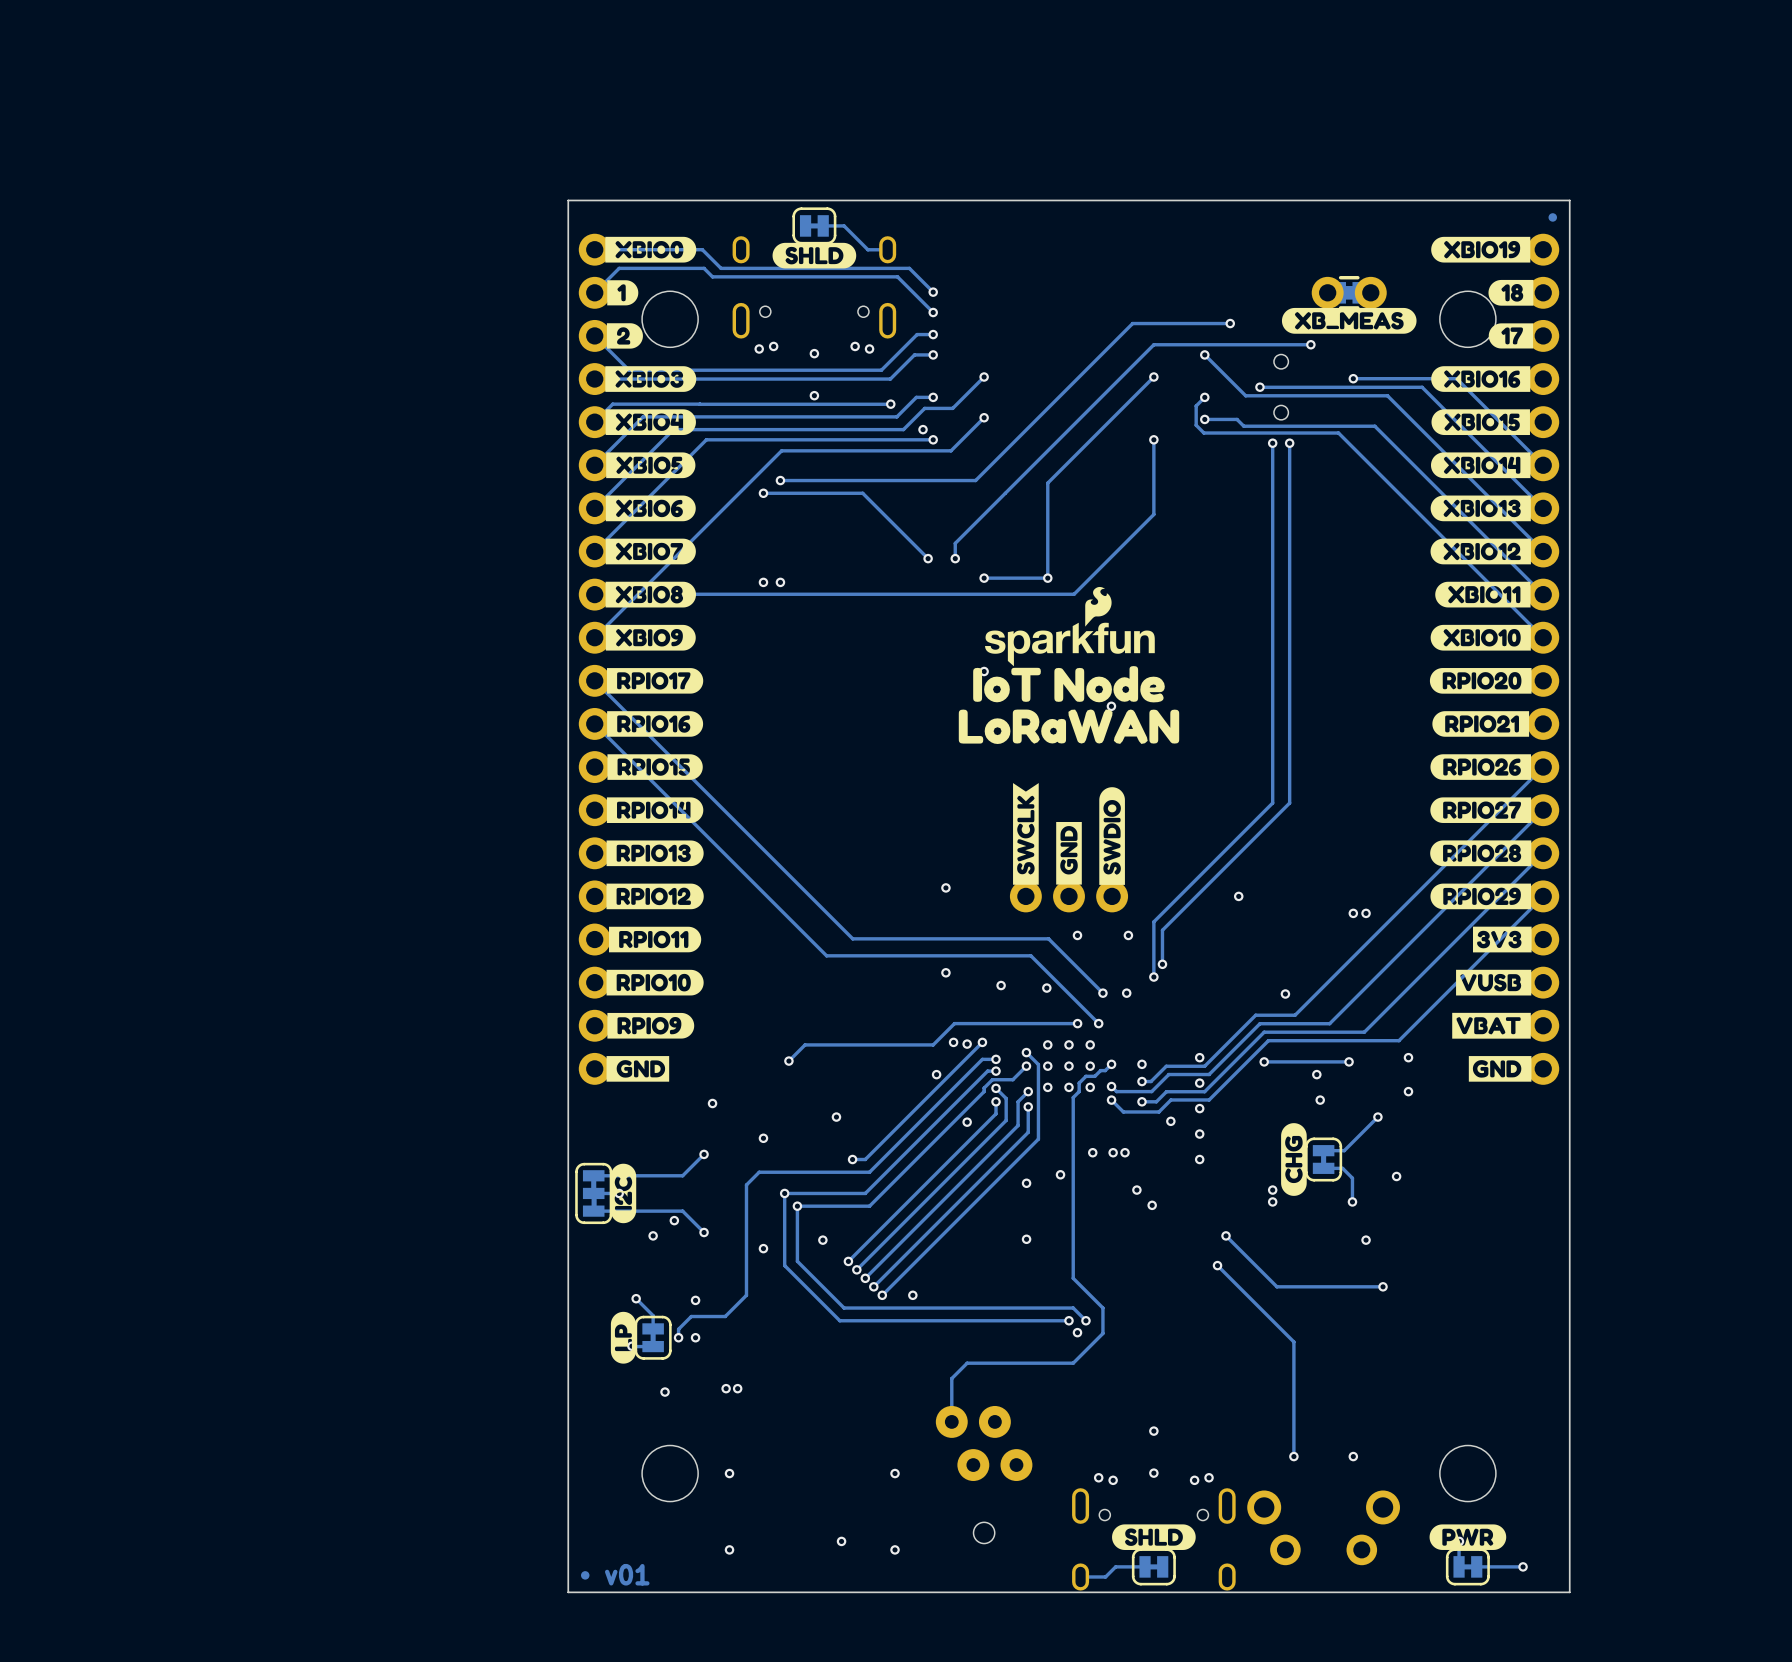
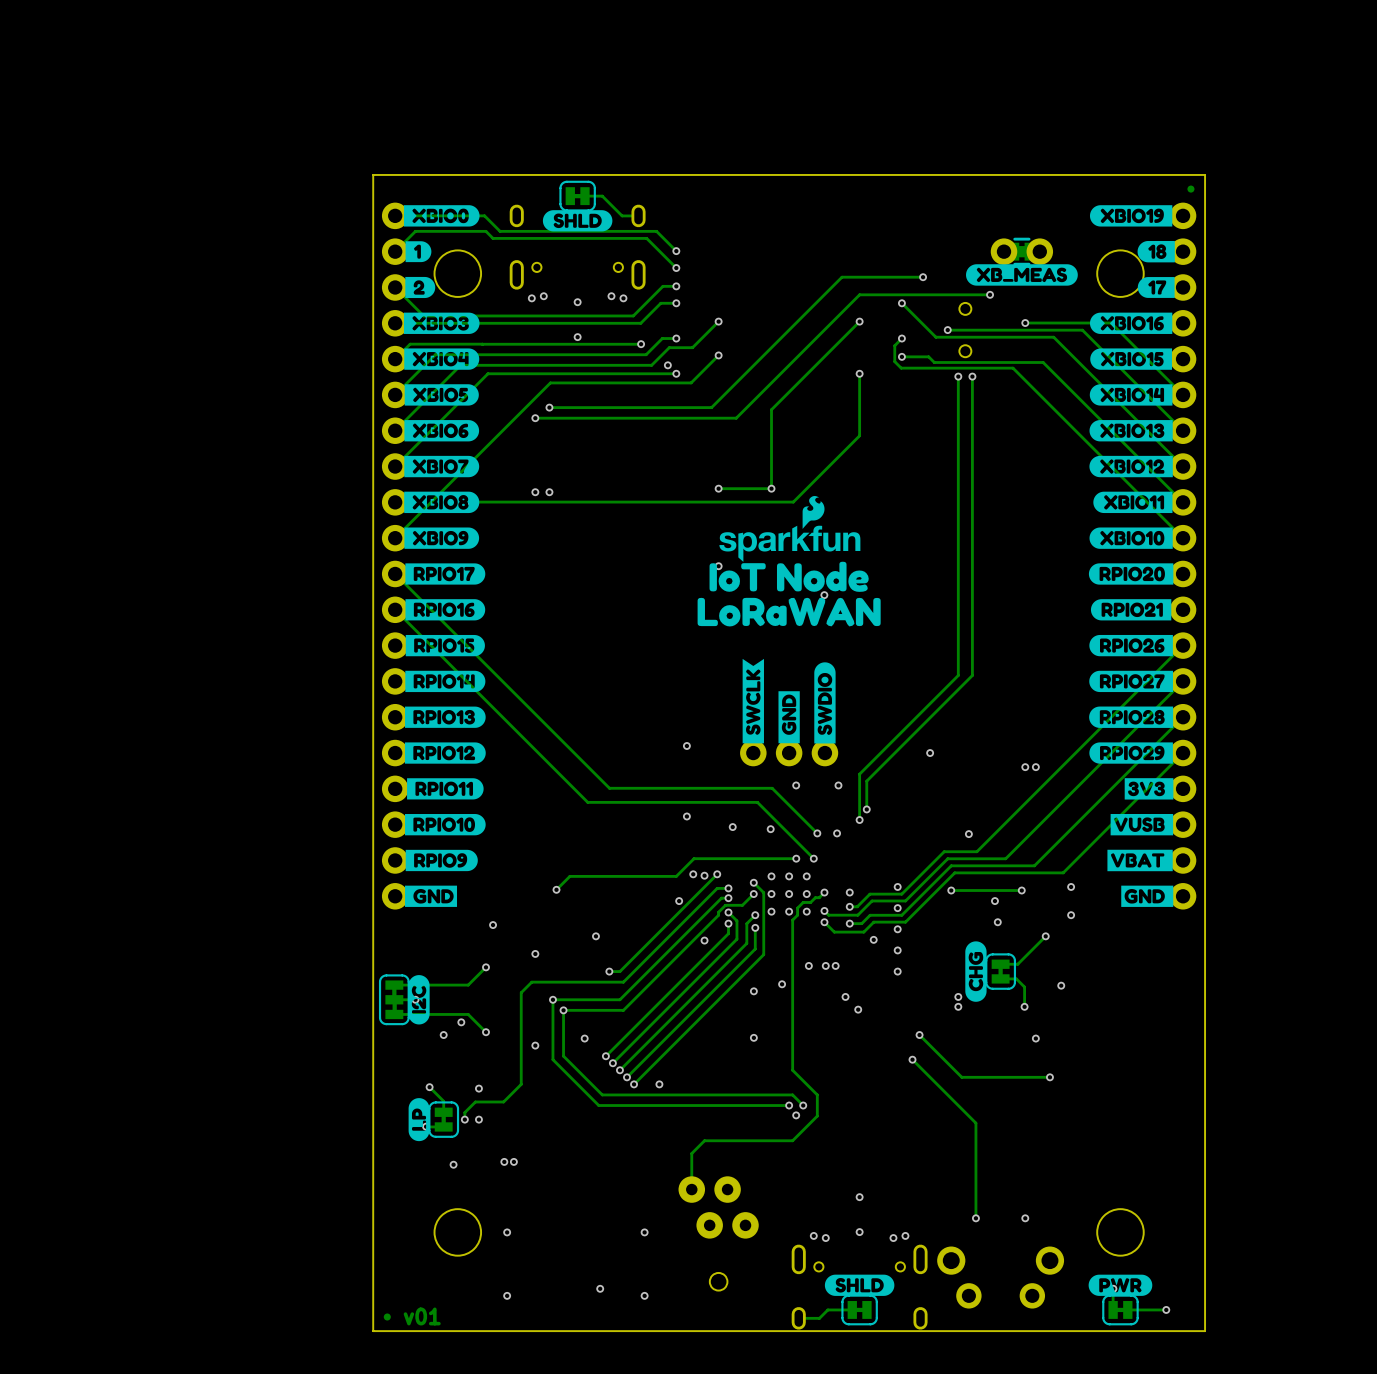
track: (862, 493) (928, 558) -> (617, 418) (736, 418)
track: (1005, 493) (955, 543) (955, 558) -> none
via: (928, 558) -> none
via: (955, 558) -> none

